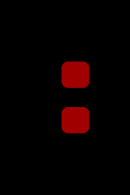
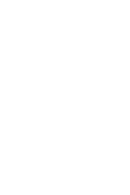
part: (75, 97) -> none

